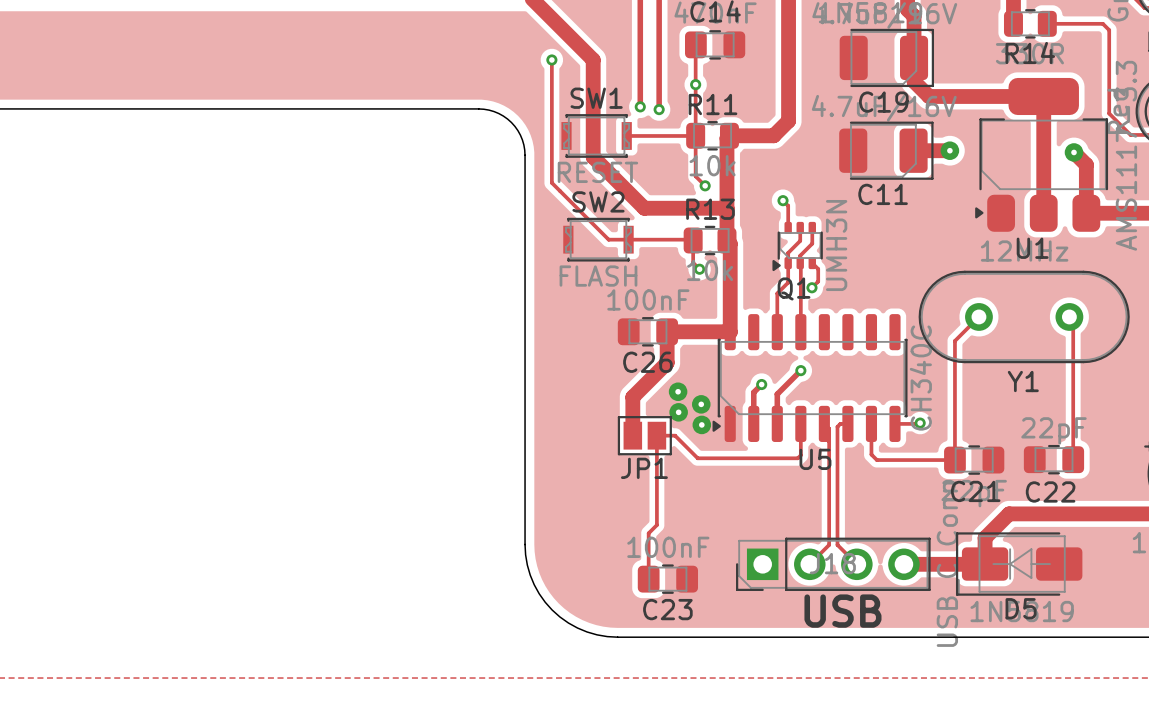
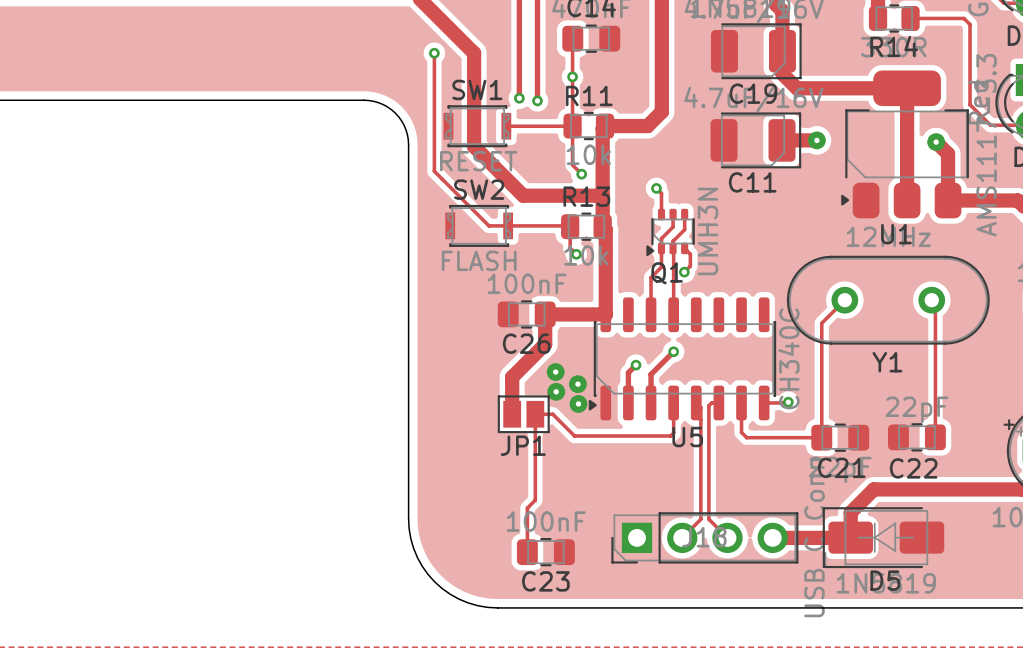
text: USB (842, 611) -> none

